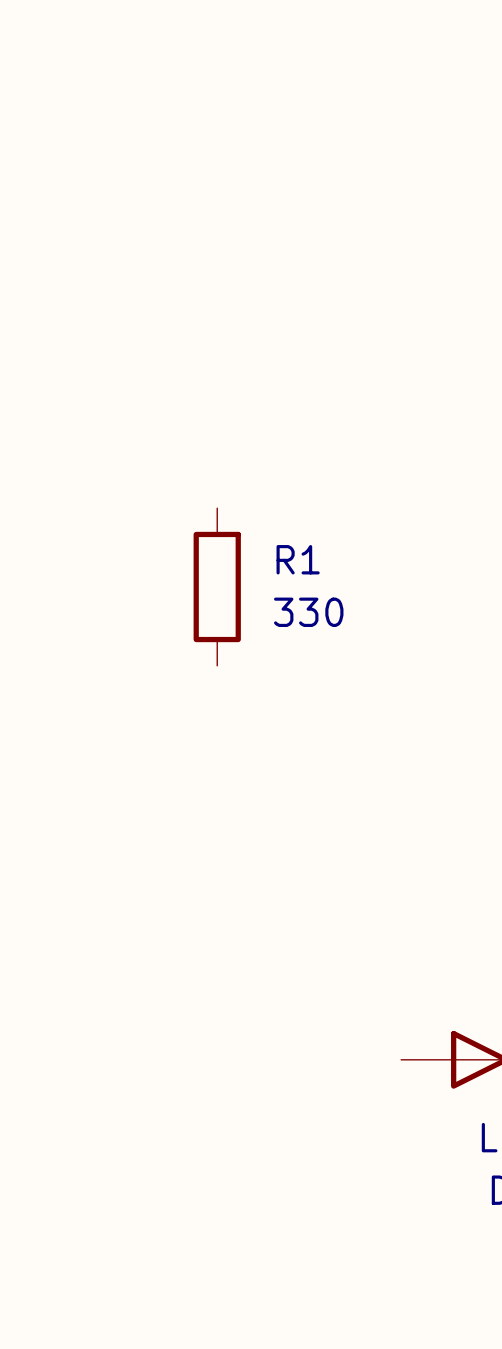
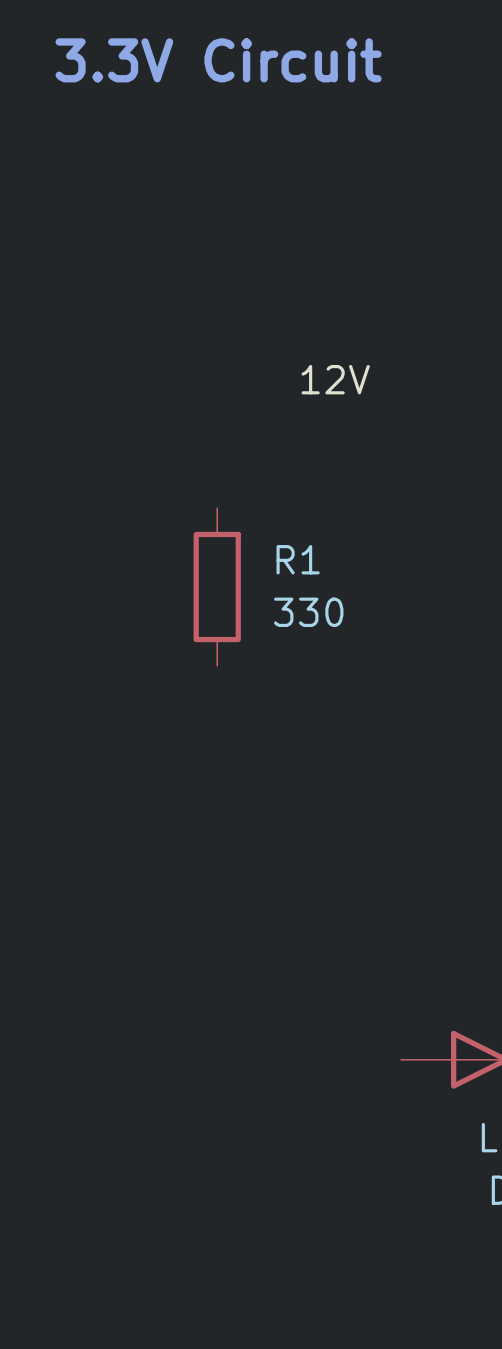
text: none -> 3.3V Circuit (218, 60)
label: none -> 12V (335, 379)

